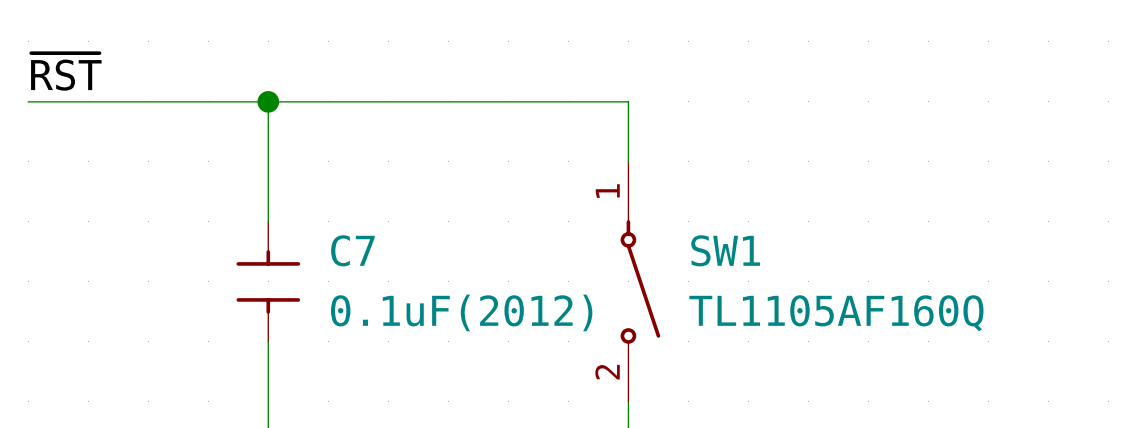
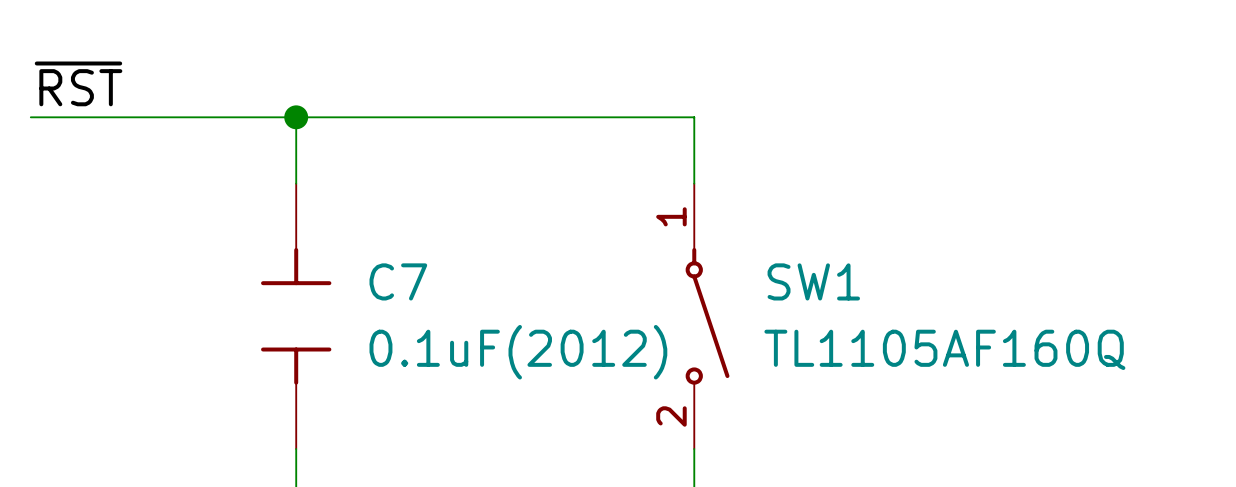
C7 symbol: [236, 221, 301, 342] -> [261, 183, 332, 450]

